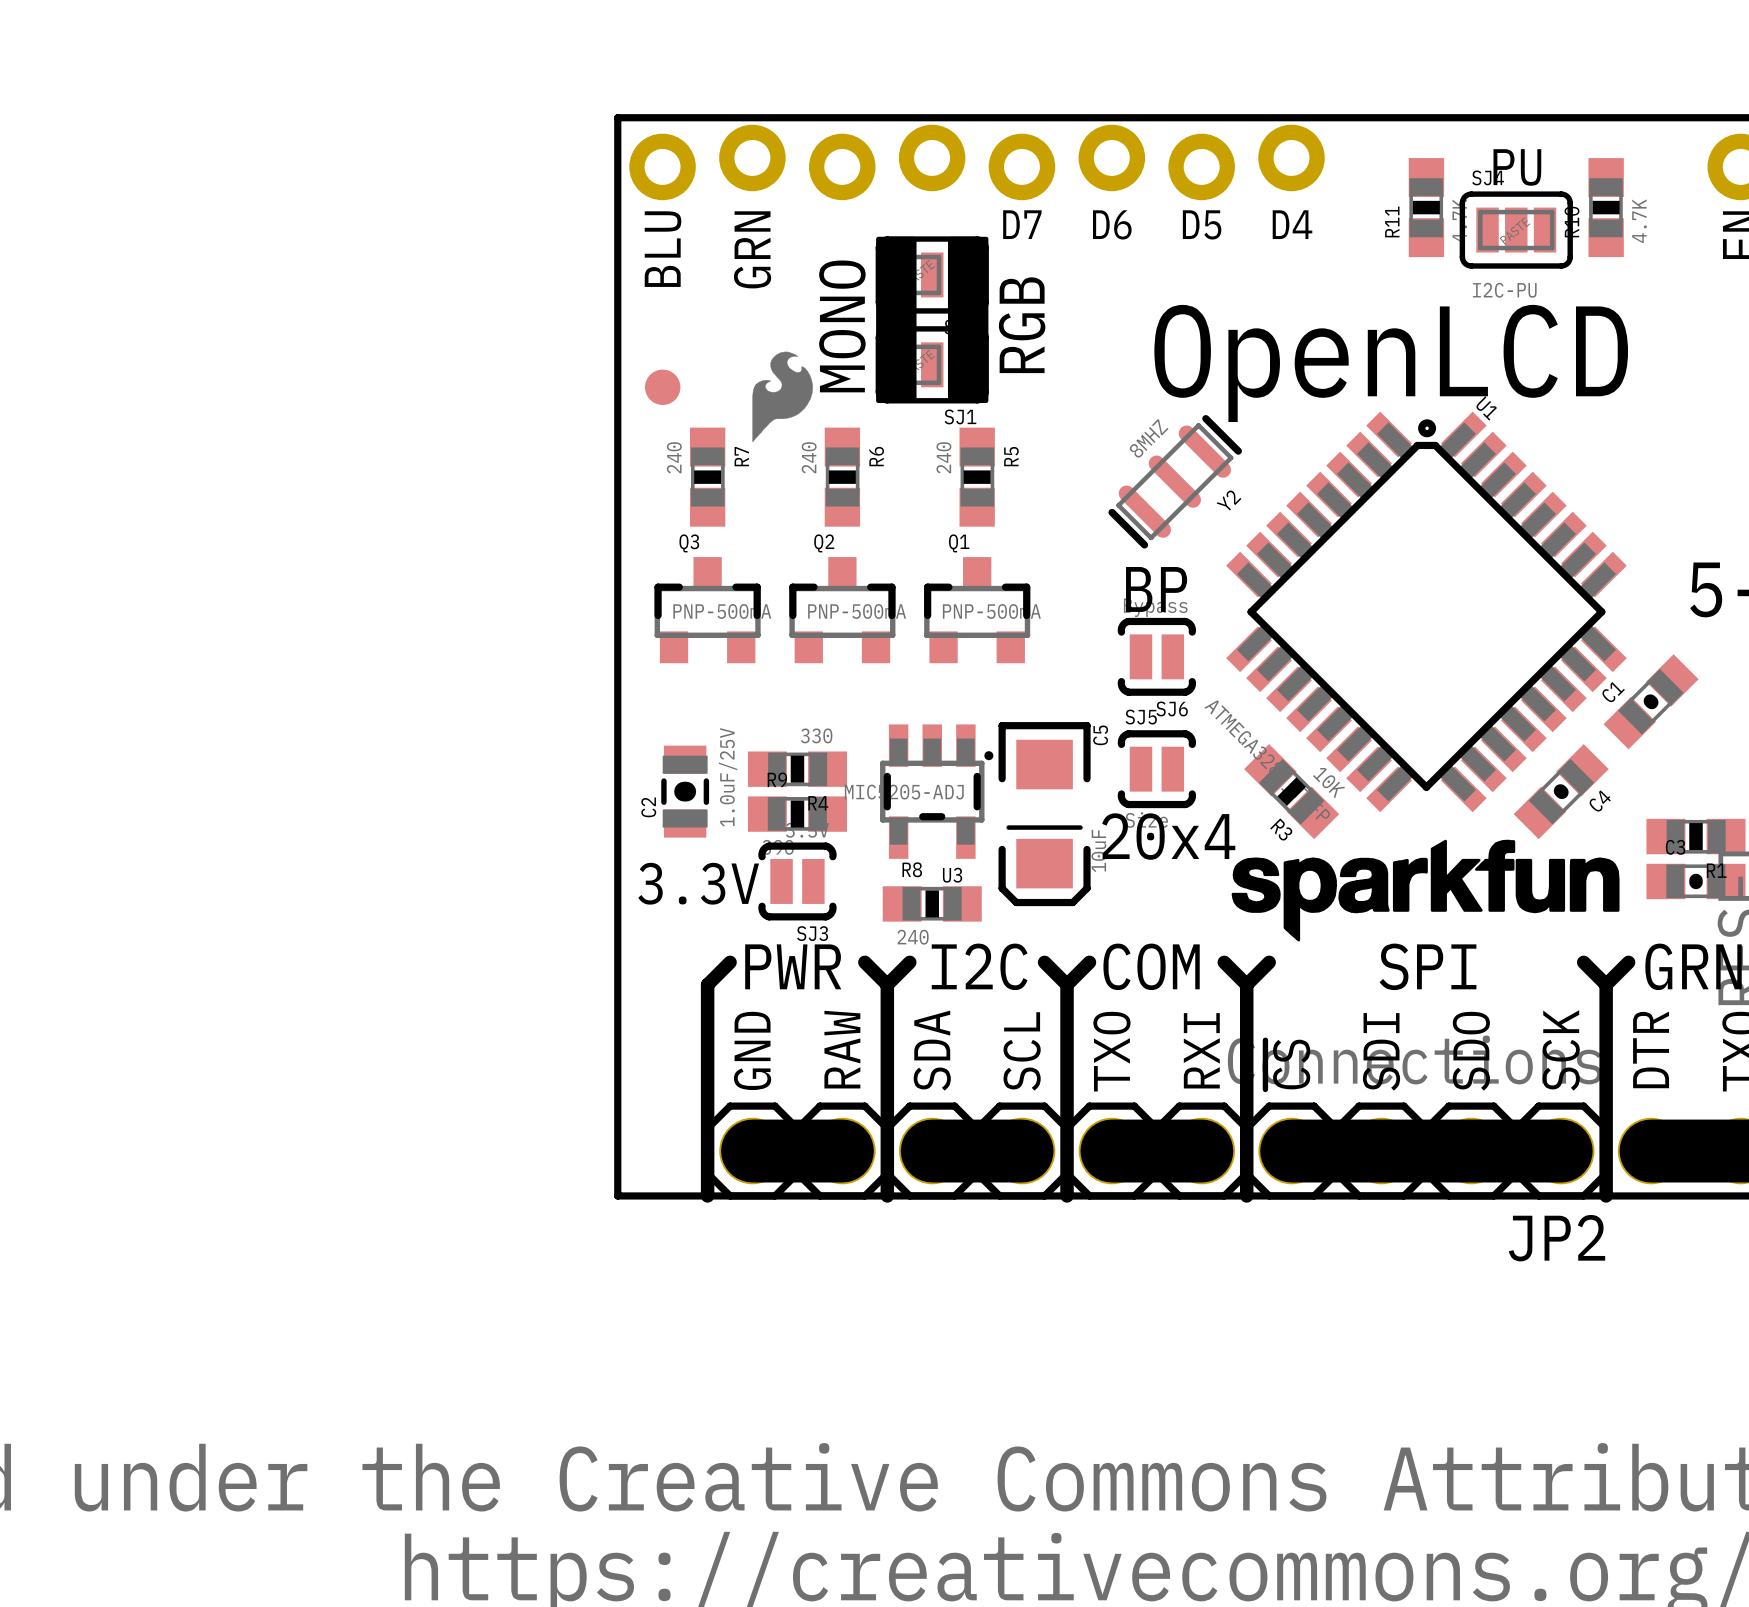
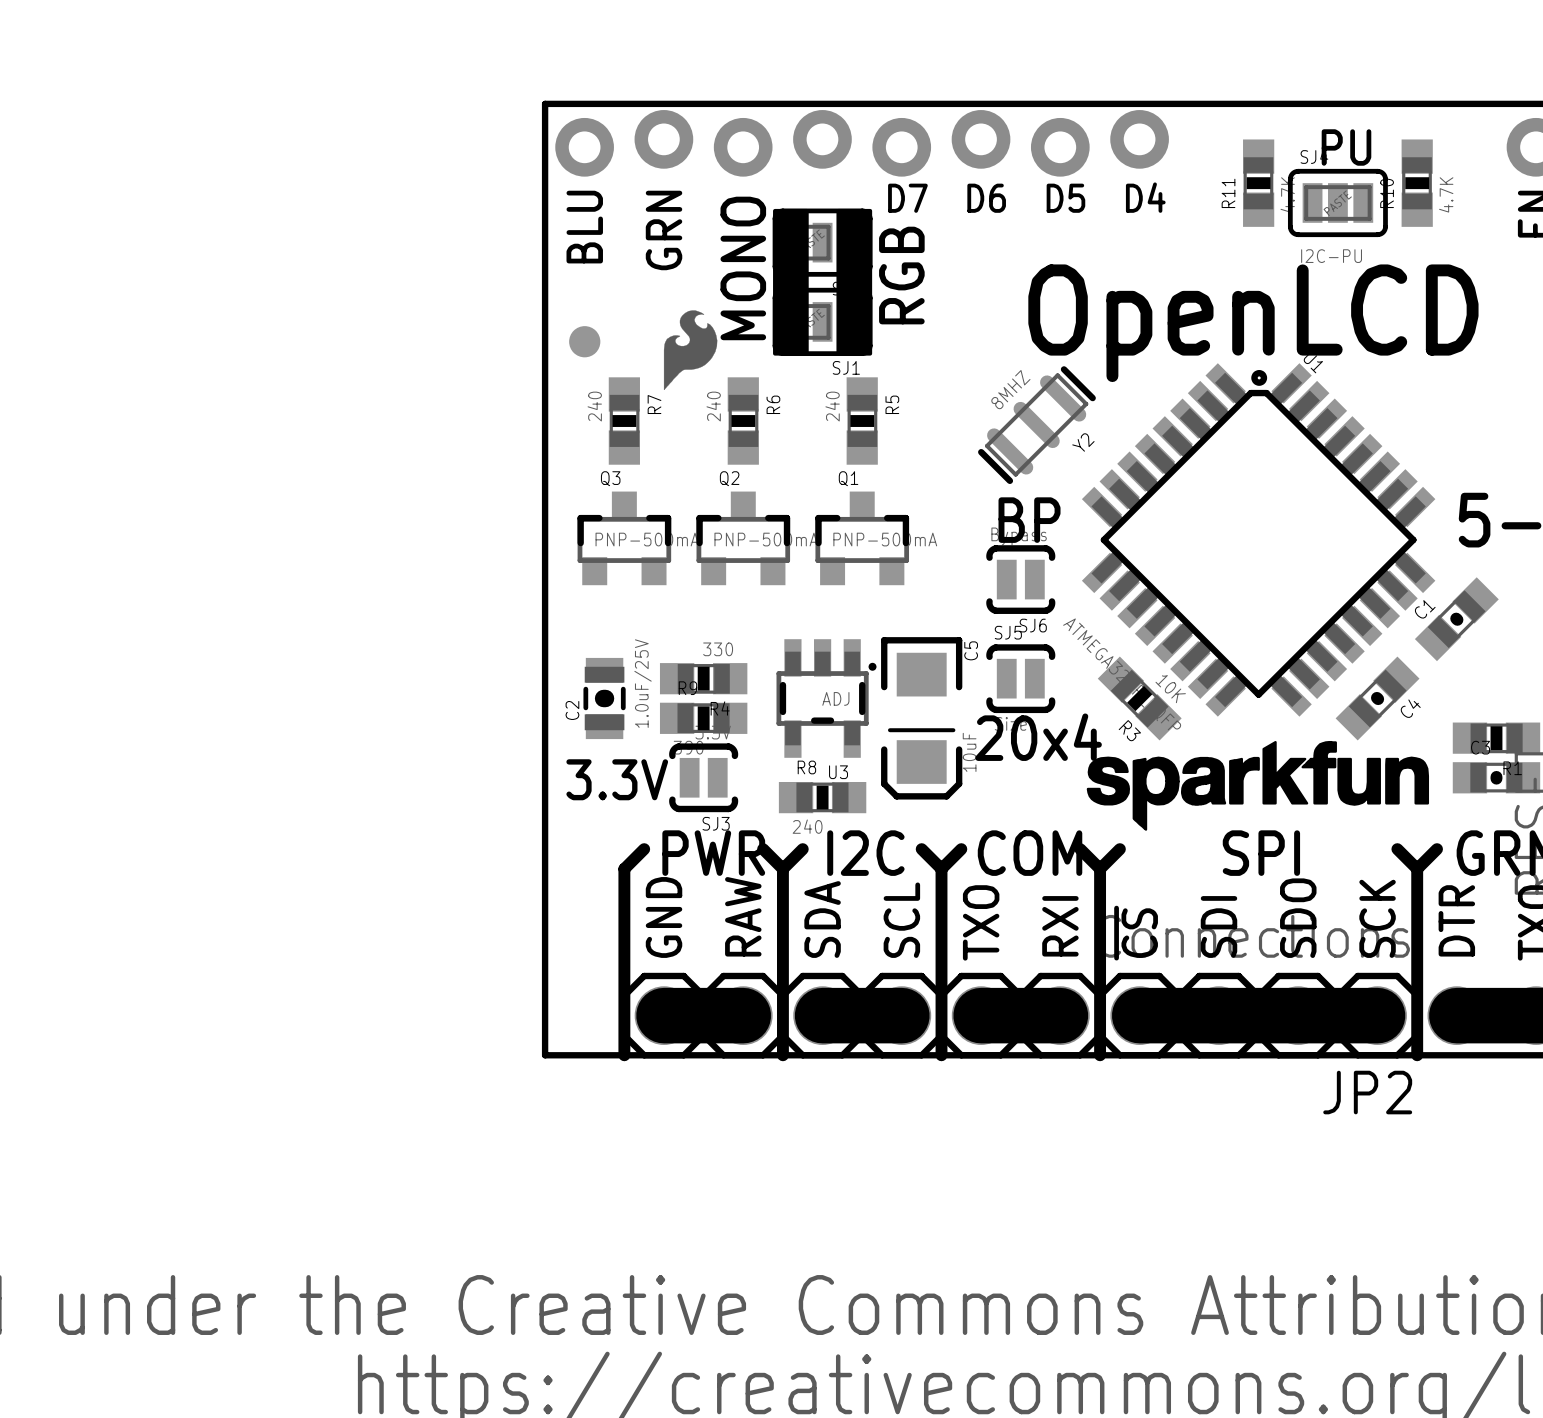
U3 value: MIC5205-ADJ (904, 792) -> ADJ (835, 698)

